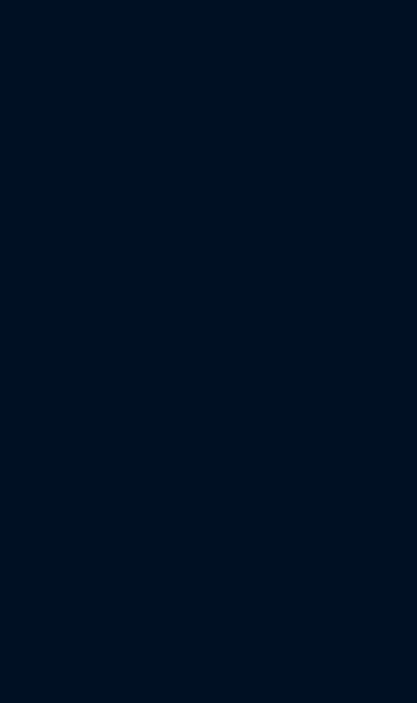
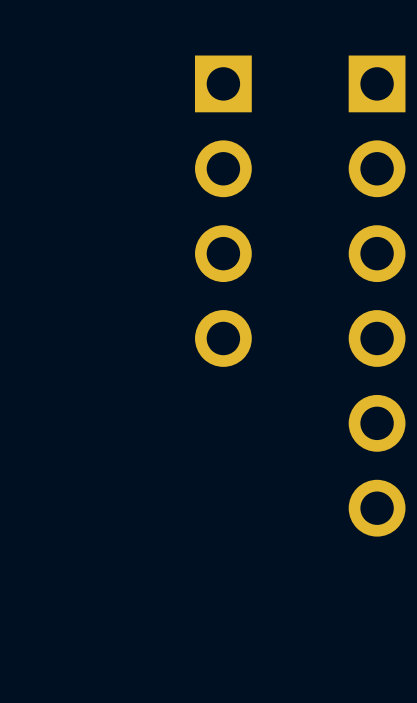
part: none -> (223, 211)
part: none -> (377, 296)

